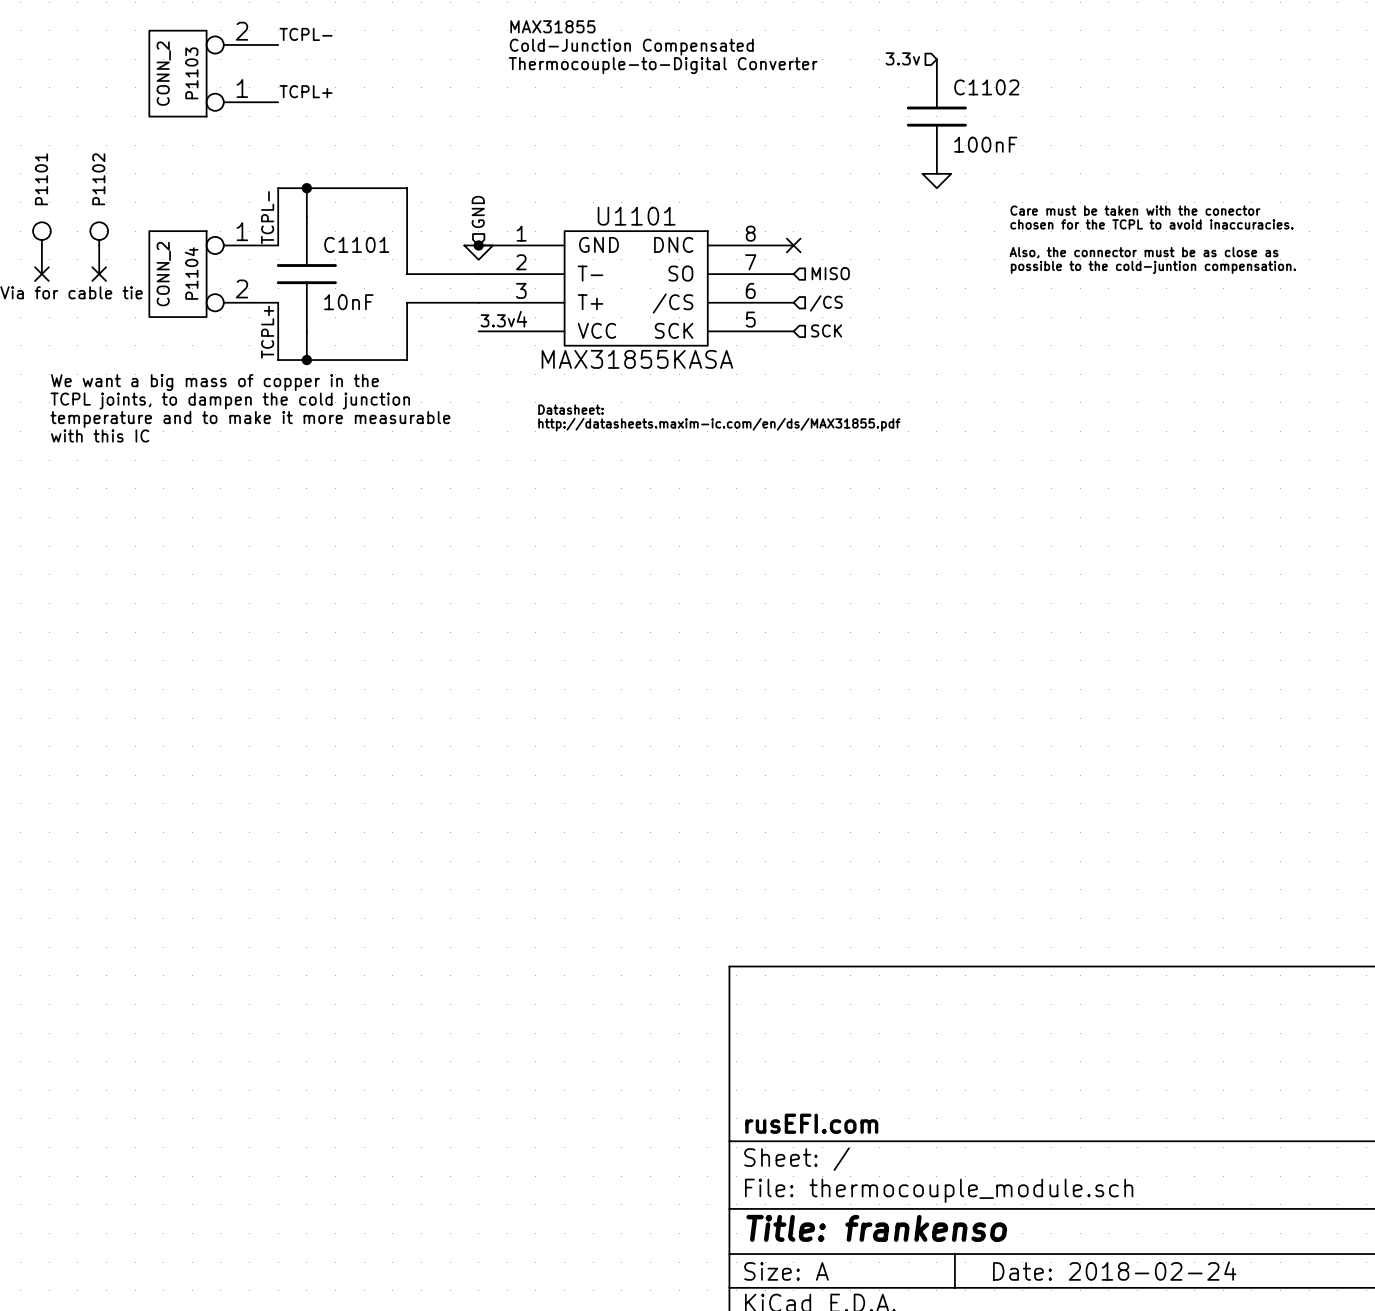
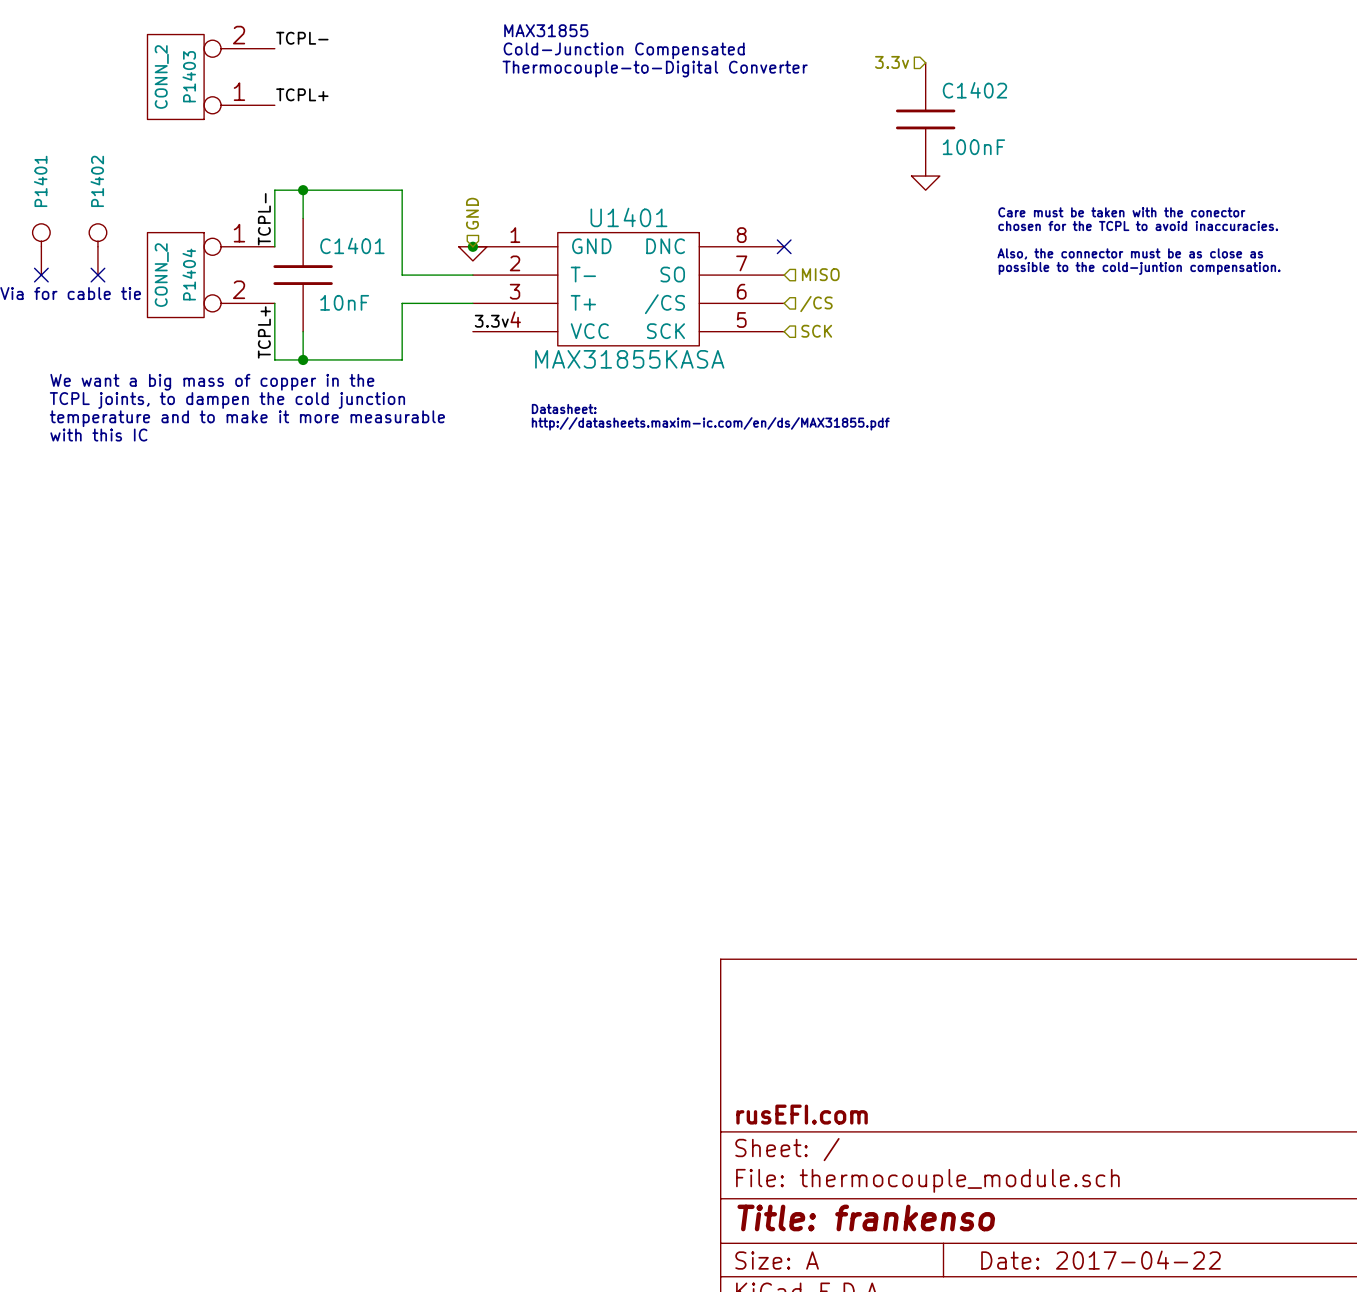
P1103 name: P1103 (191, 73) -> P1403 (189, 76)
C1102 name: C1102 (986, 87) -> C1402 (974, 90)
P1101 name: P1101 (41, 179) -> P1401 (40, 181)
P1102 name: P1102 (98, 179) -> P1402 (97, 181)
U1101 name: U1101 (636, 216) -> U1401 (628, 217)
C1101 name: C1101 (356, 244) -> C1401 (352, 245)
P1104 name: P1104 (191, 273) -> P1404 (189, 274)
title block: Date: 2018-02-24 (1114, 1271) -> Date: 2017-04-22 (1100, 1260)

